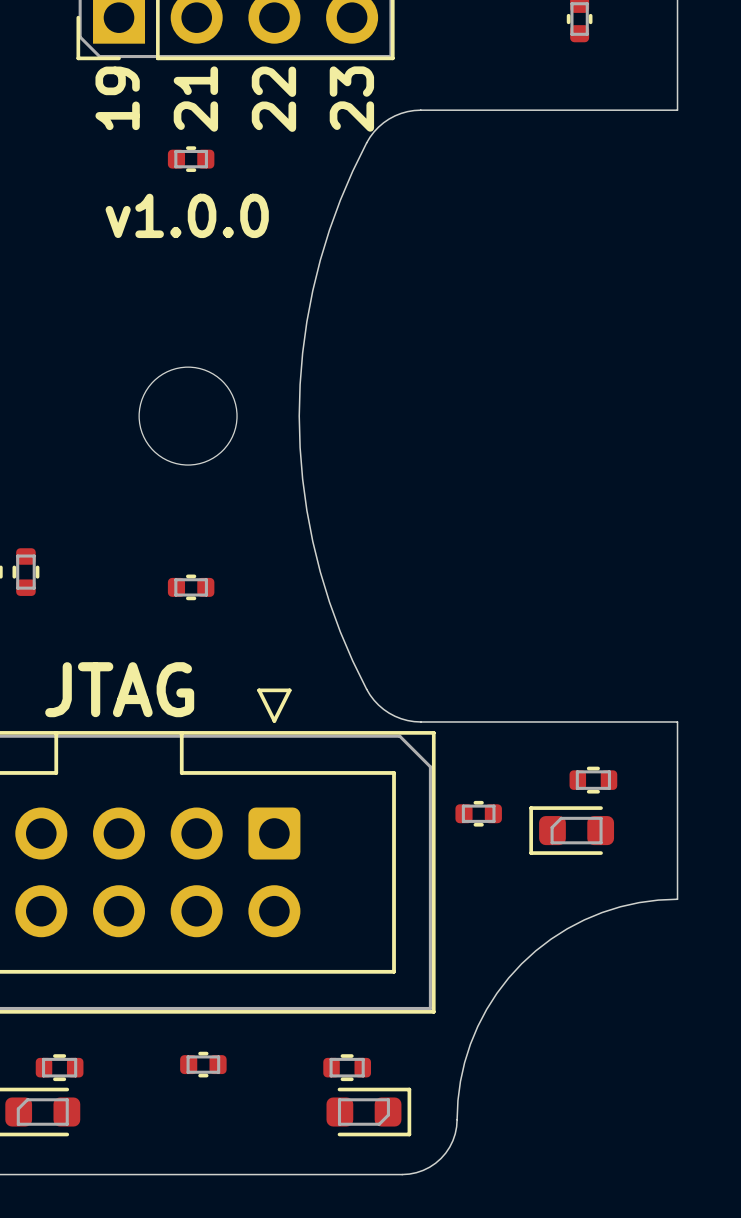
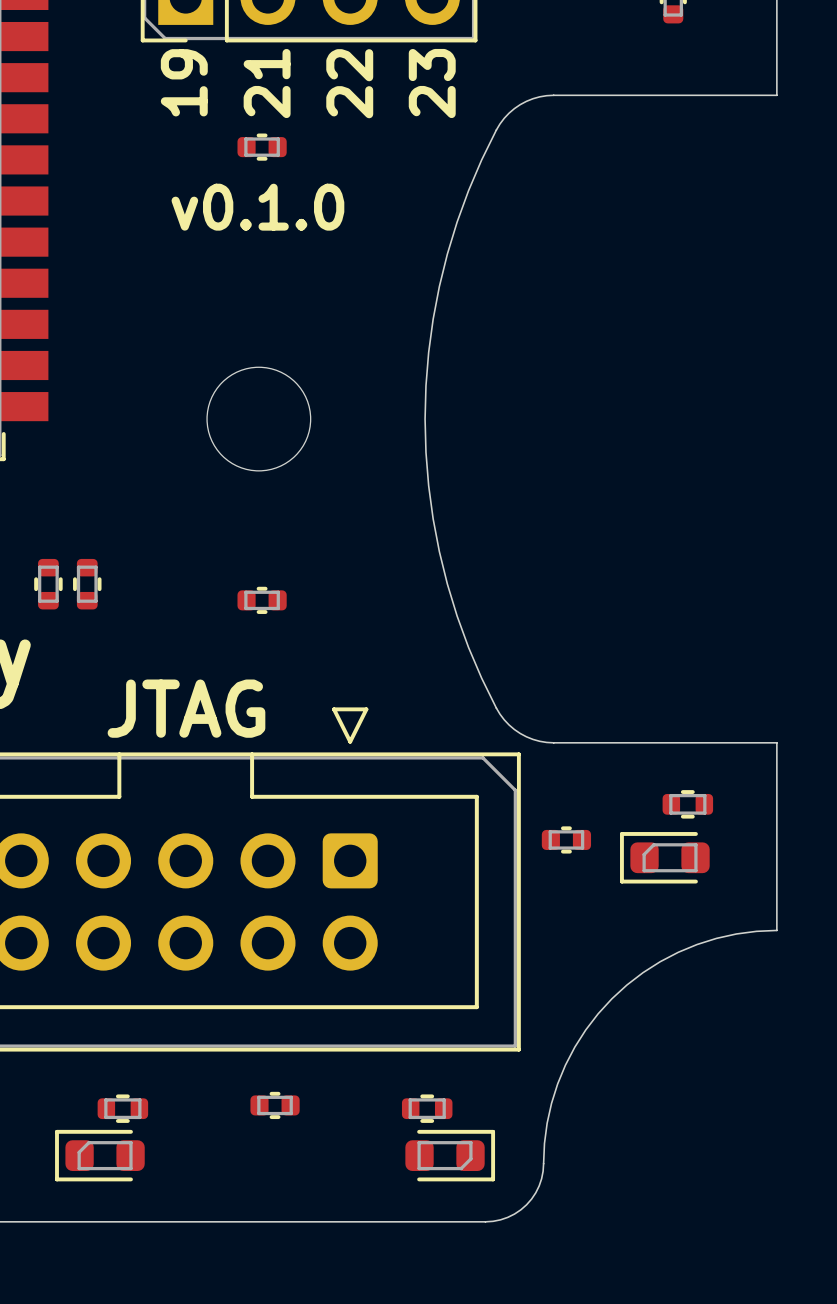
board edge: (466, 110) (420, 110) (401, 113) (378, 127) (366, 142) (340, 200) (320, 260) (312, 290) (302, 353) (299, 416) (302, 479) (312, 541) (329, 602) (352, 660) (366, 689) (383, 709) (401, 718) (420, 721) (466, 721) -> (553, 95) (539, 96) (526, 101) (514, 108) (504, 118) (496, 129) (468, 190) (457, 222) (439, 286) (428, 352) (425, 419) (428, 485) (439, 551) (447, 584) (468, 647) (496, 708) (504, 719) (514, 729) (526, 736) (539, 741) (553, 742)
text: v1.0.0 (187, 215) -> v0.1.0 (257, 207)

